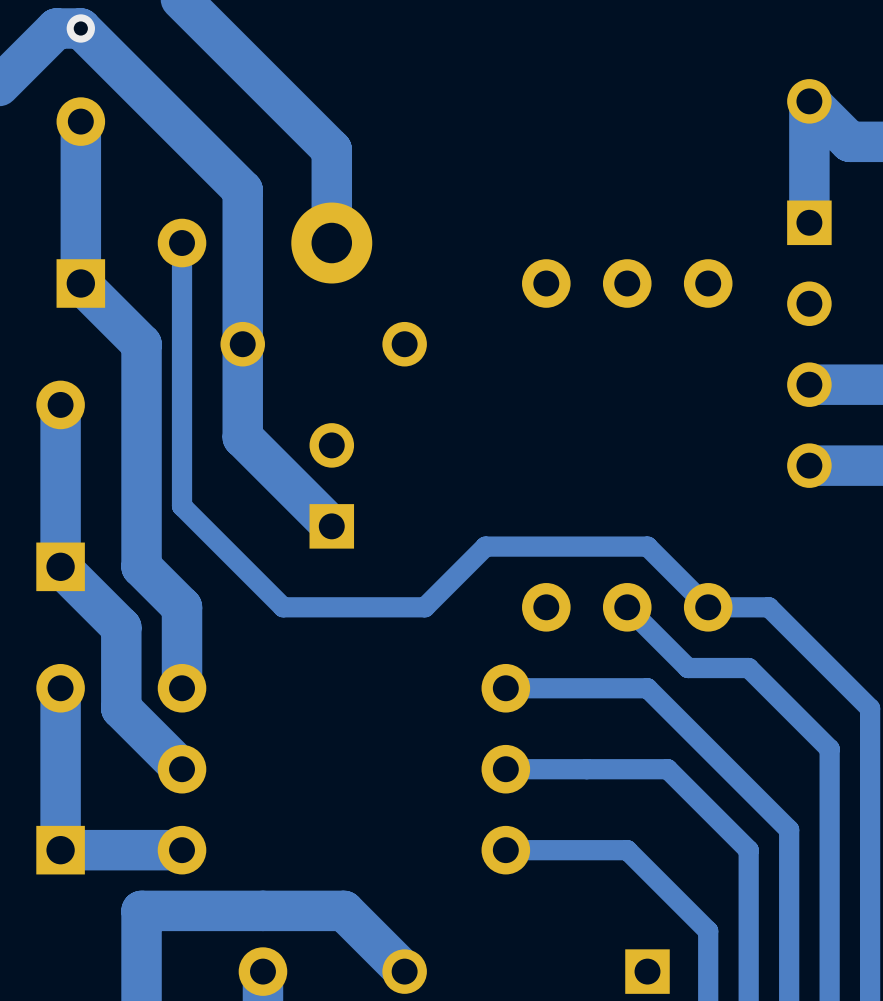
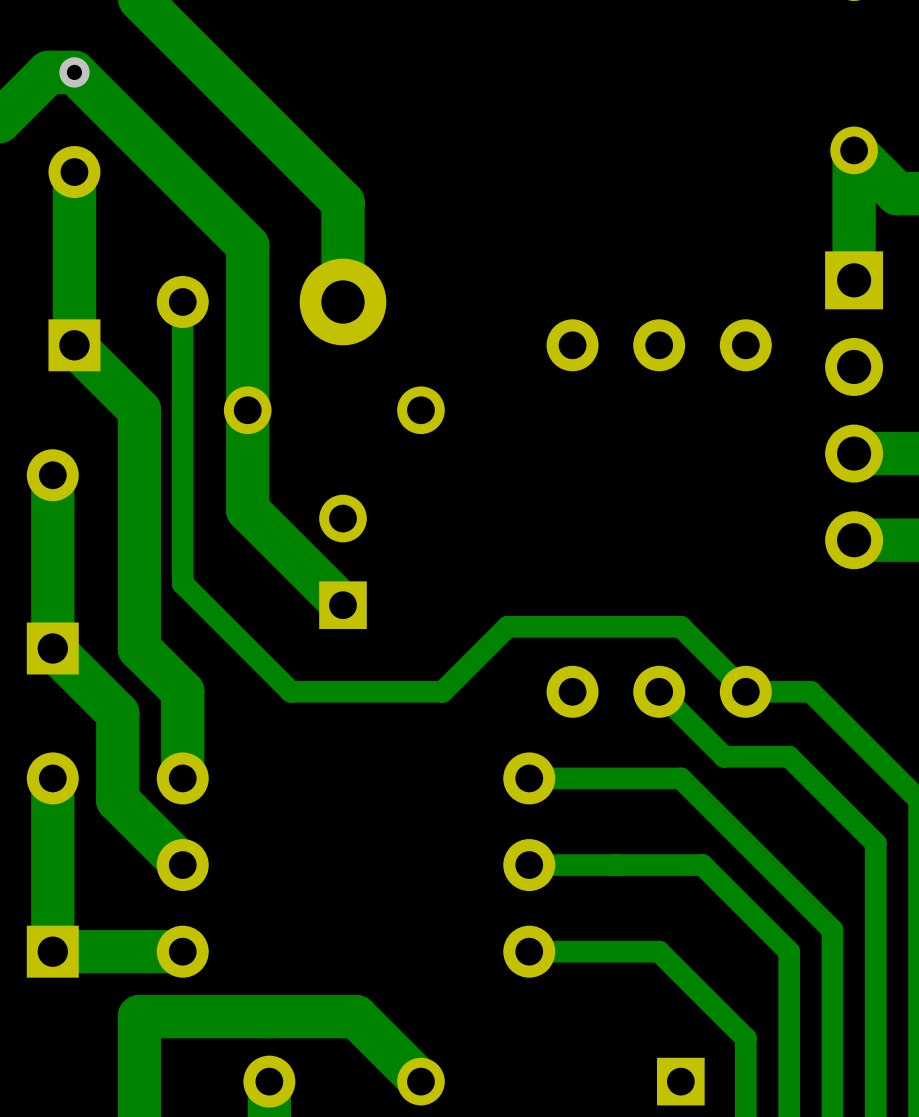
part footprint: [787, 200, 832, 488] -> [825, 251, 884, 570]

